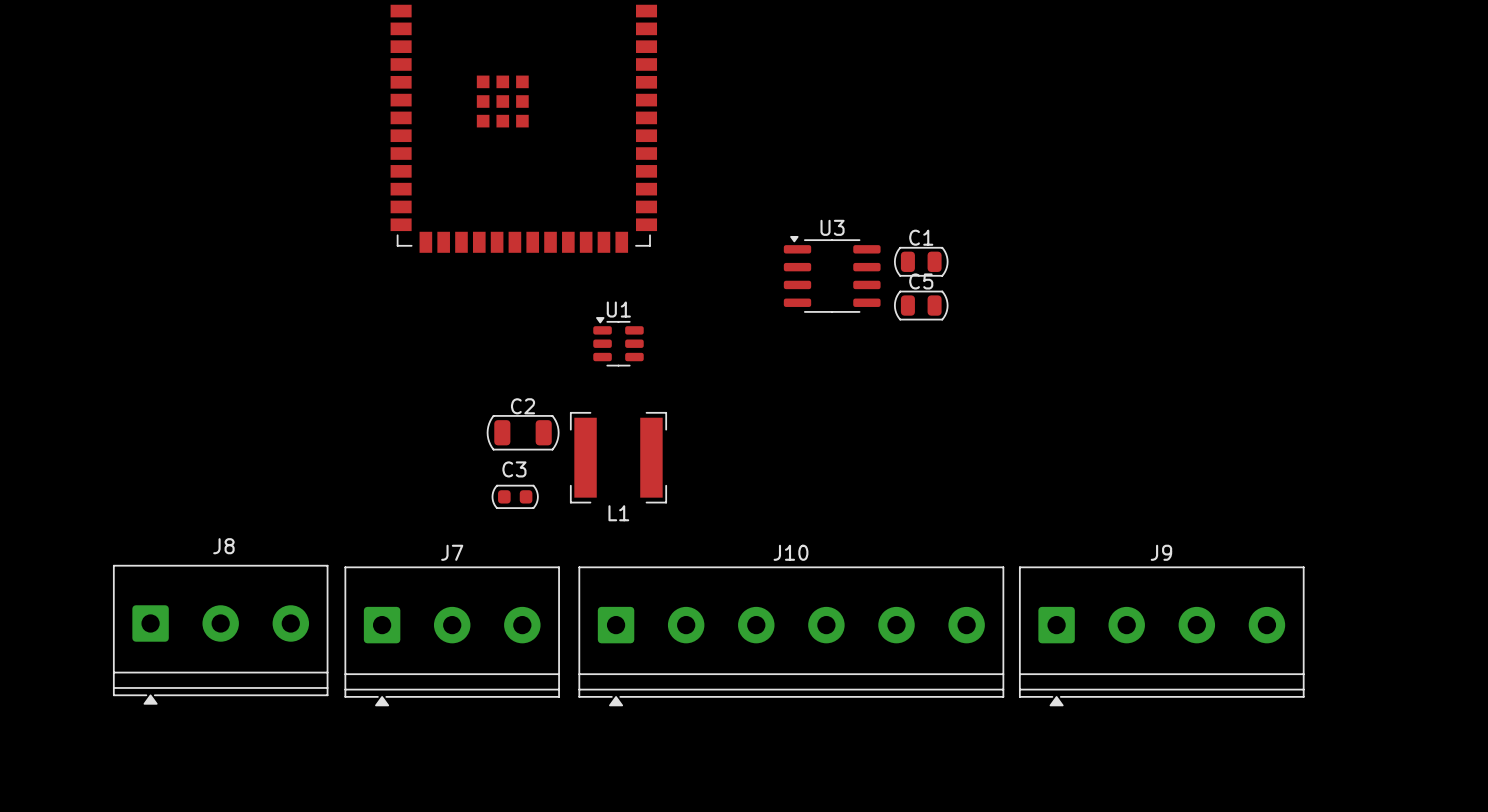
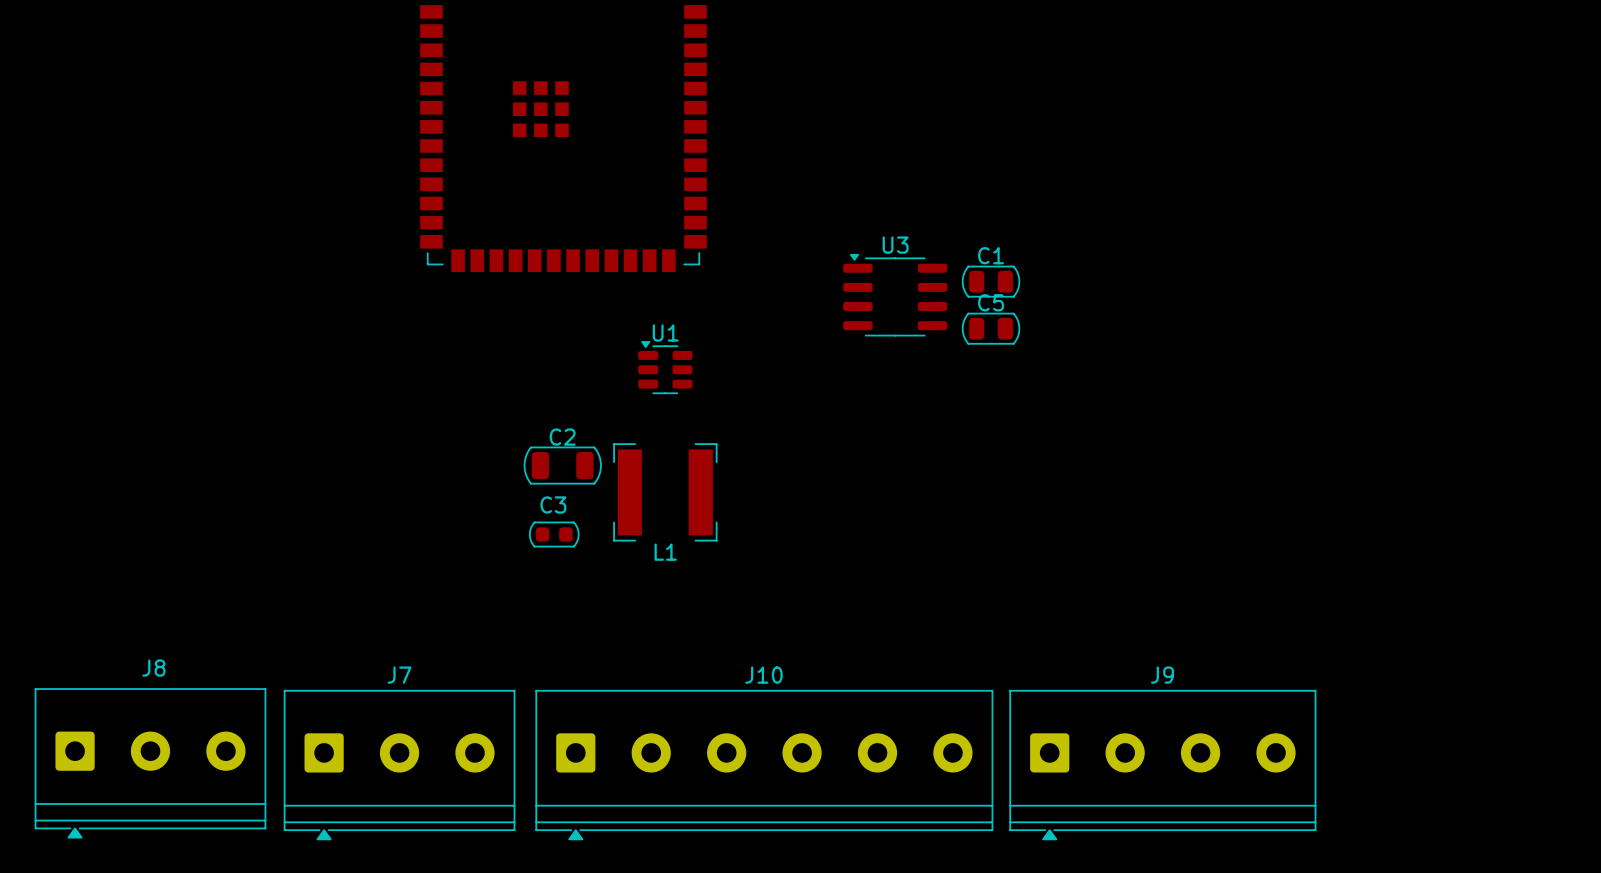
J8 position: (220, 634) -> (150, 763)
J7 position: (452, 636) -> (399, 765)
J10 position: (791, 636) -> (764, 765)
J9 position: (1161, 636) -> (1162, 765)

